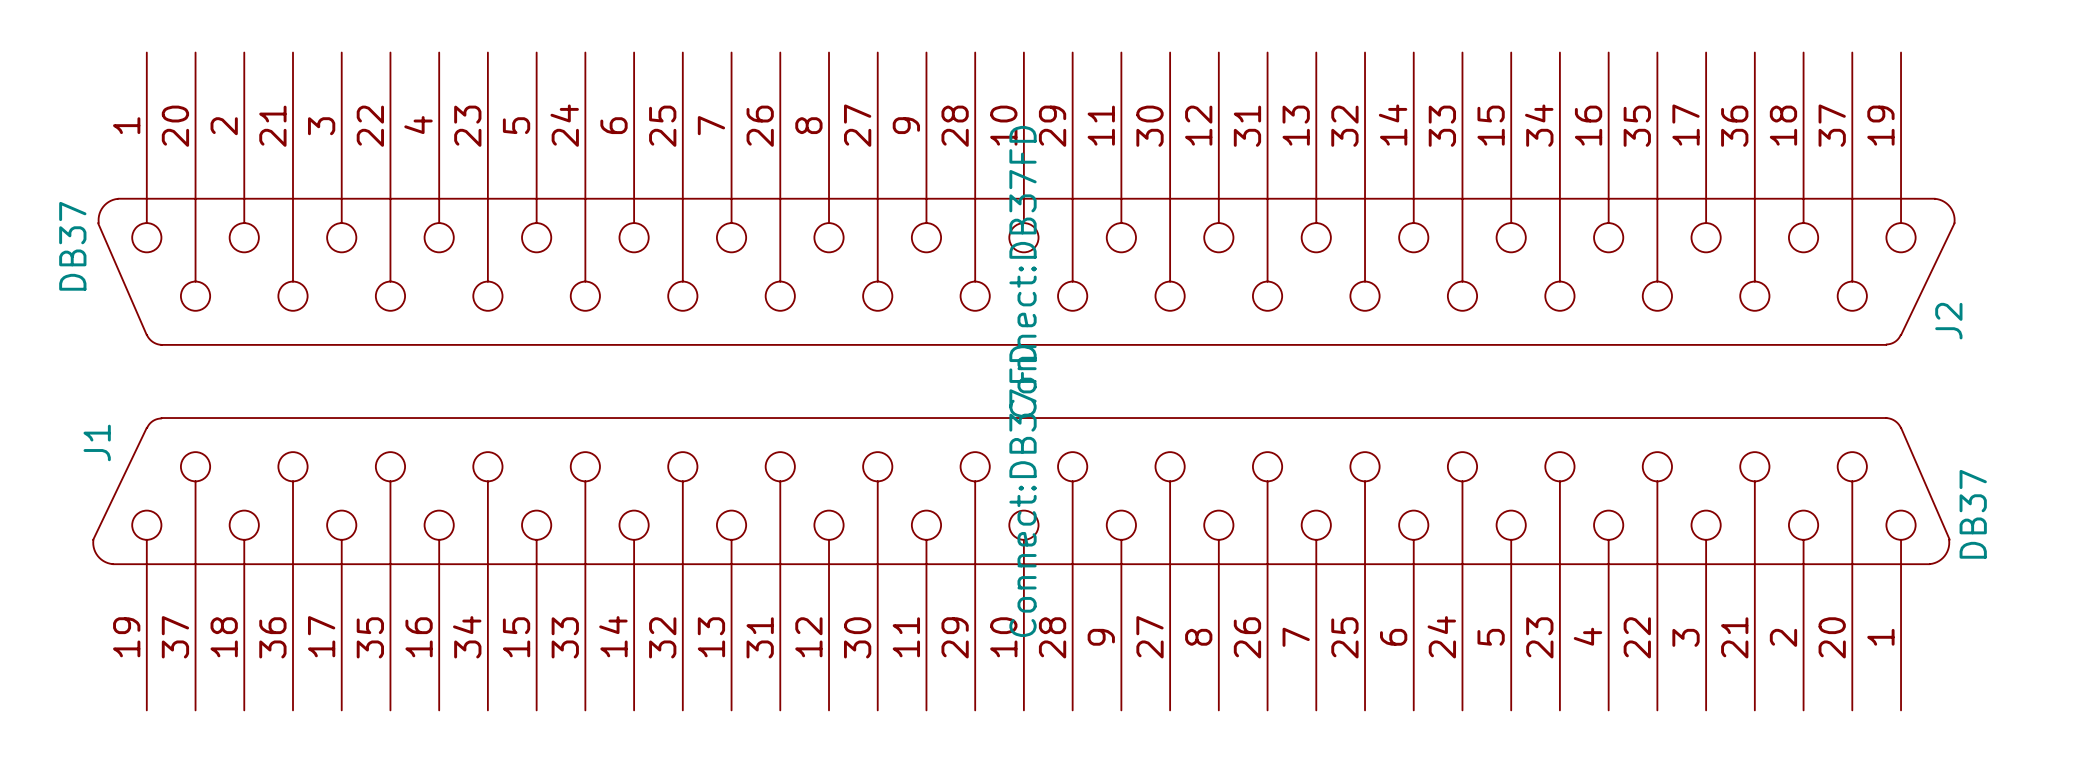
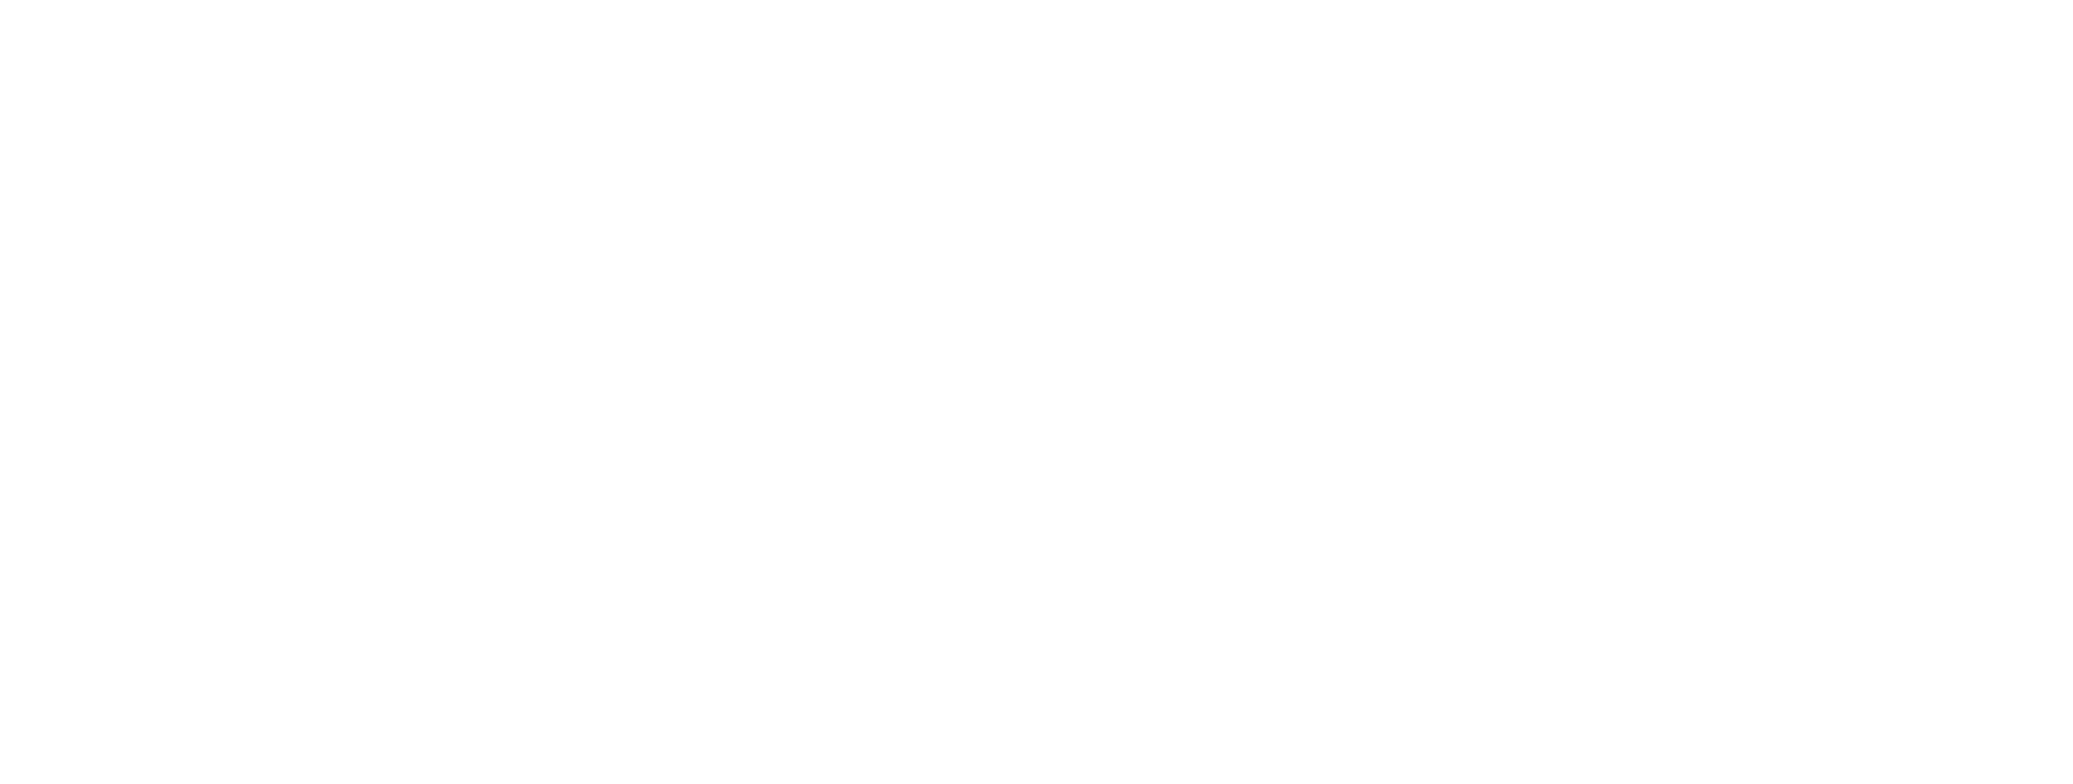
J2: DB37 (1026, 198) -> none
J1: DB37 (1021, 564) -> none

